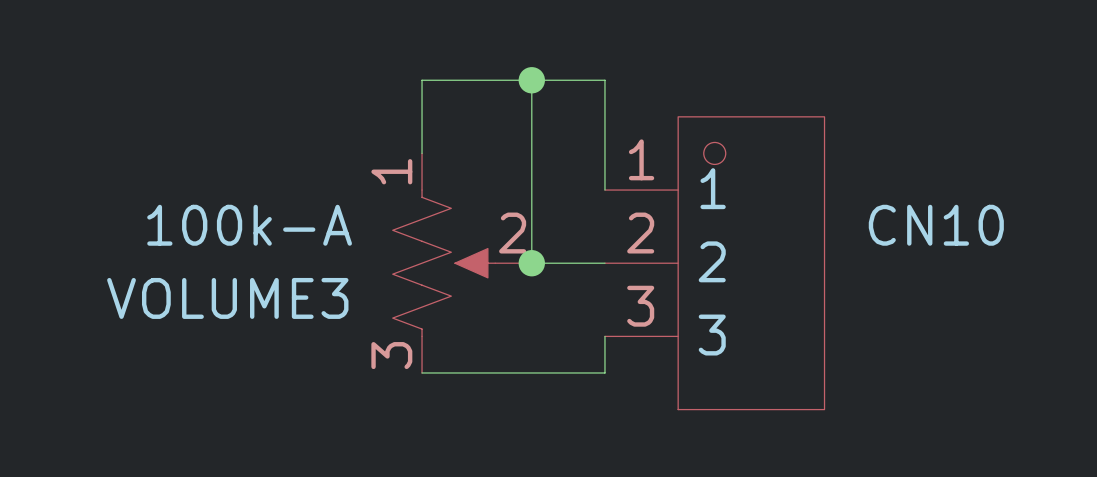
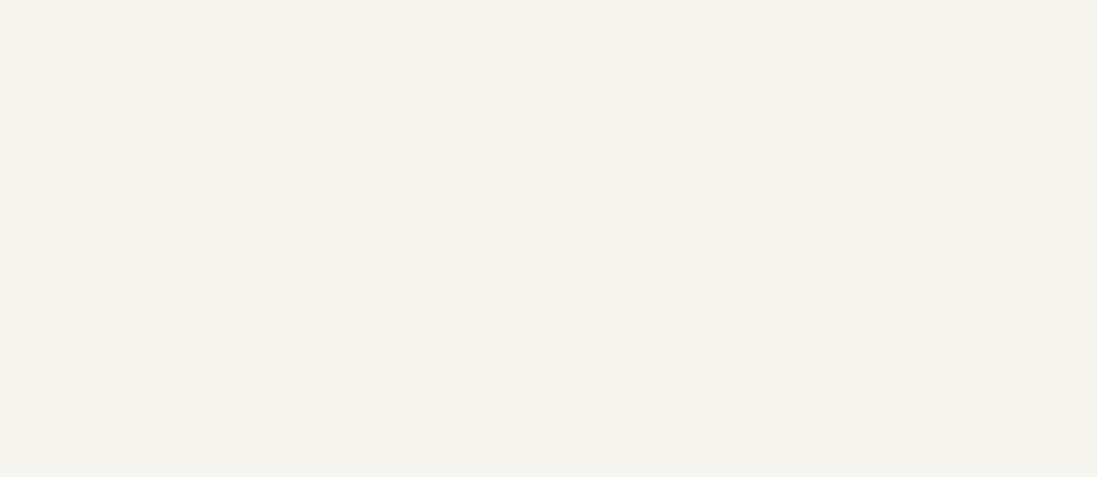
wire: (531, 80) (531, 263) (604, 263) -> none
junction: (531, 80) -> none
wire: (422, 153) (422, 80) (604, 80) (604, 190) -> none
VOLUME3: 100k-A (462, 263) -> none
junction: (531, 263) -> none
CN10: (714, 263) -> none
wire: (604, 336) (604, 372) (422, 372) -> none

